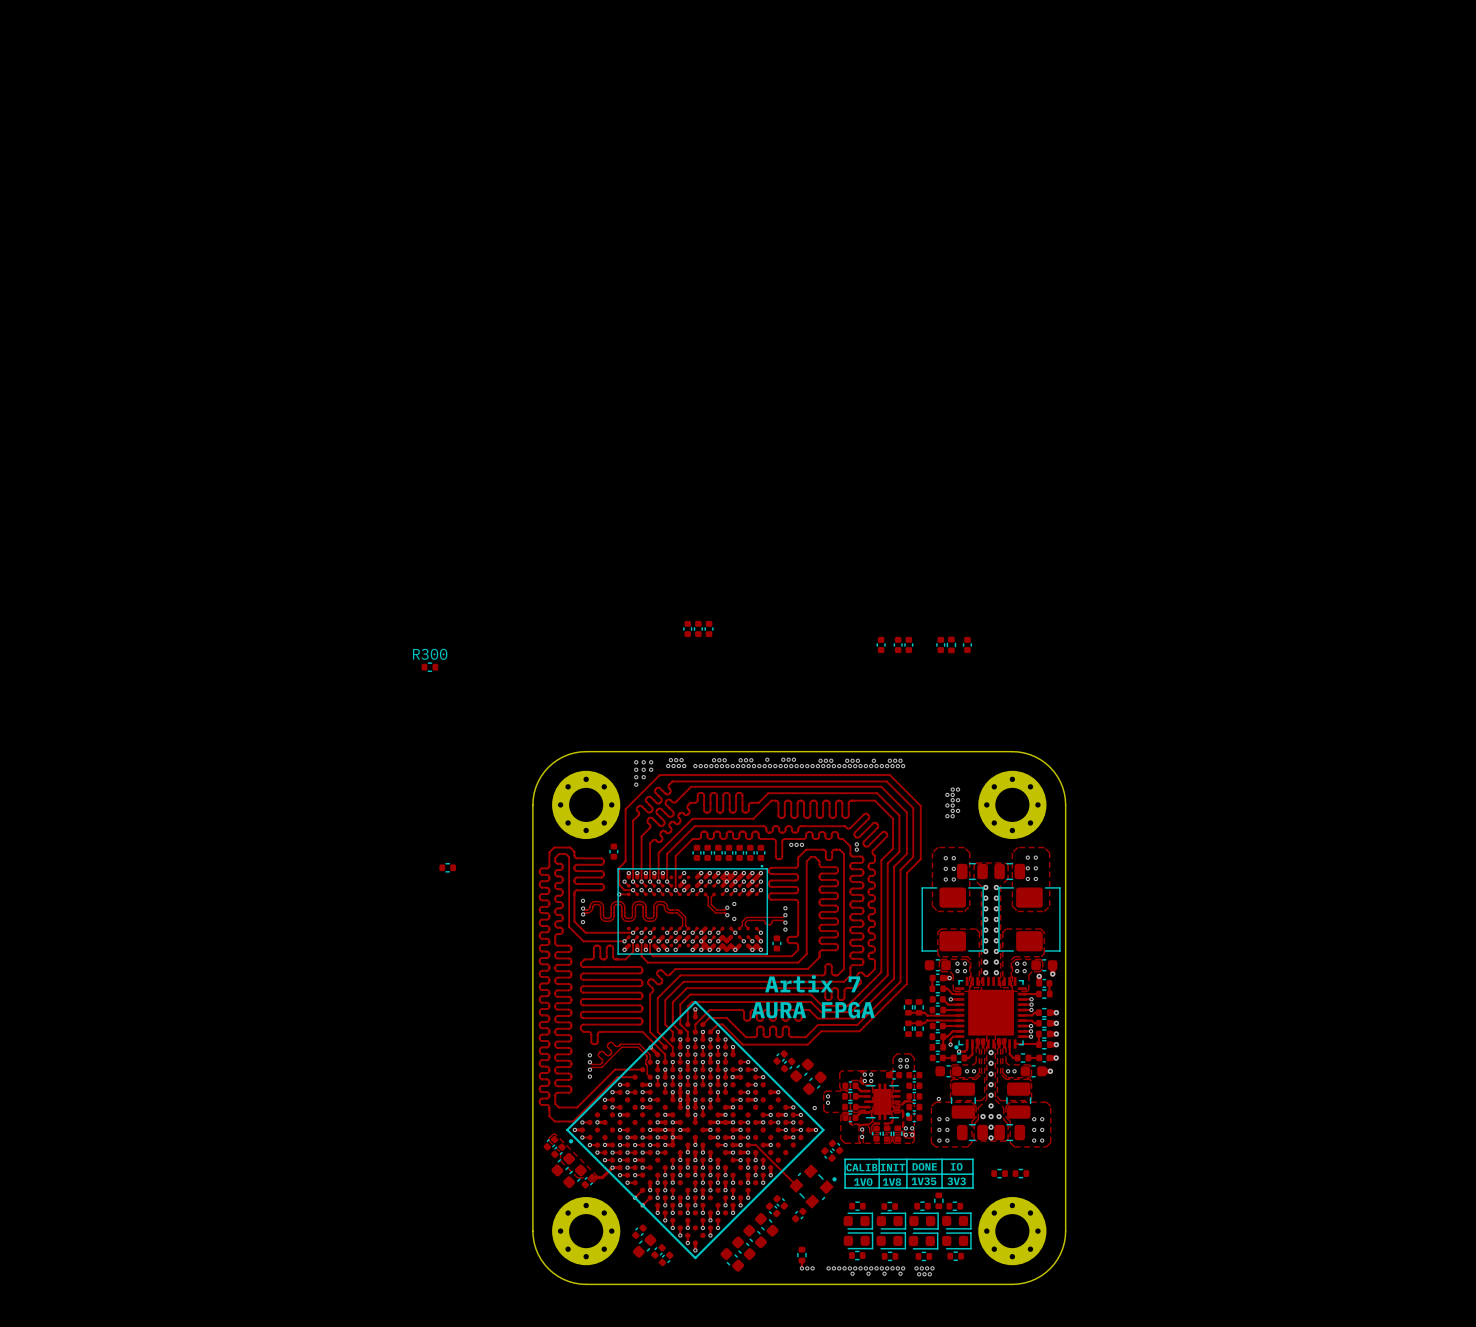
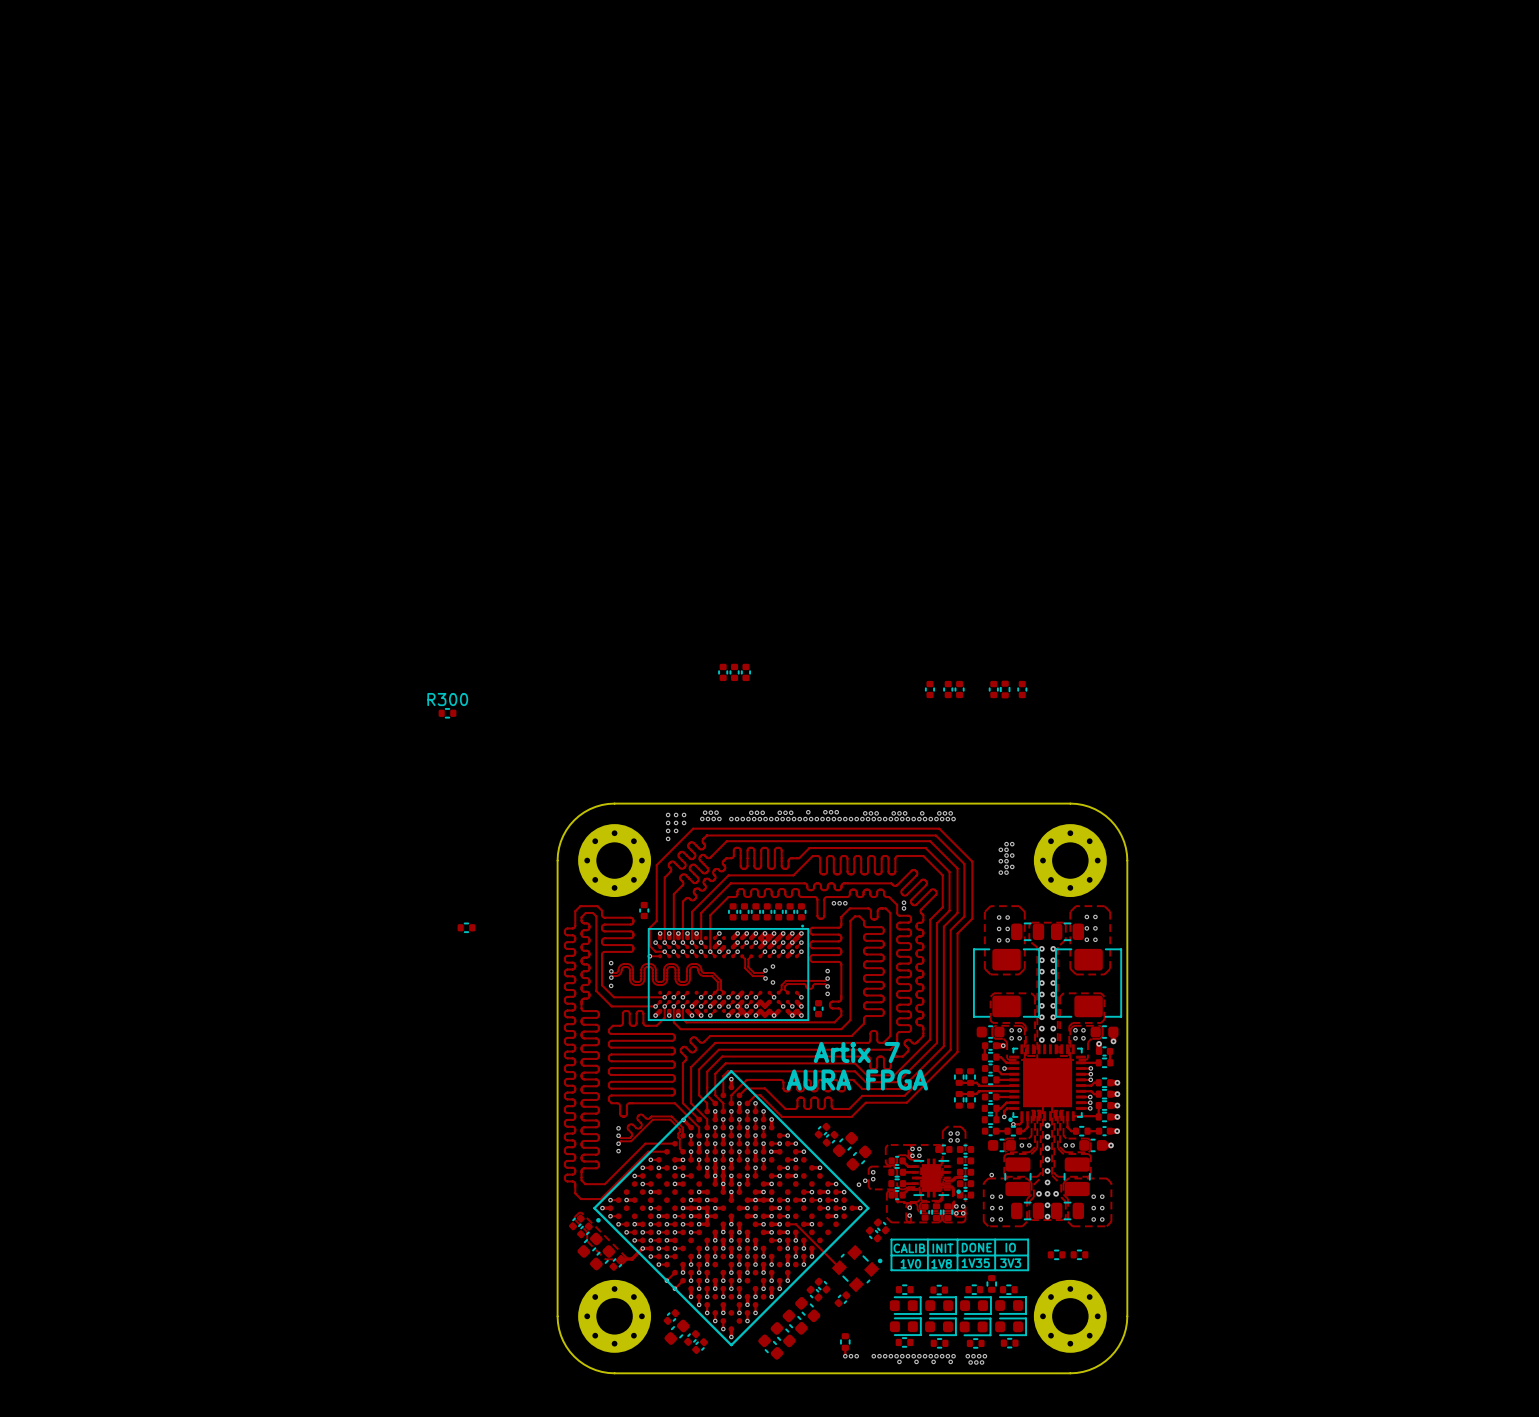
via: none -> (865, 1180)

